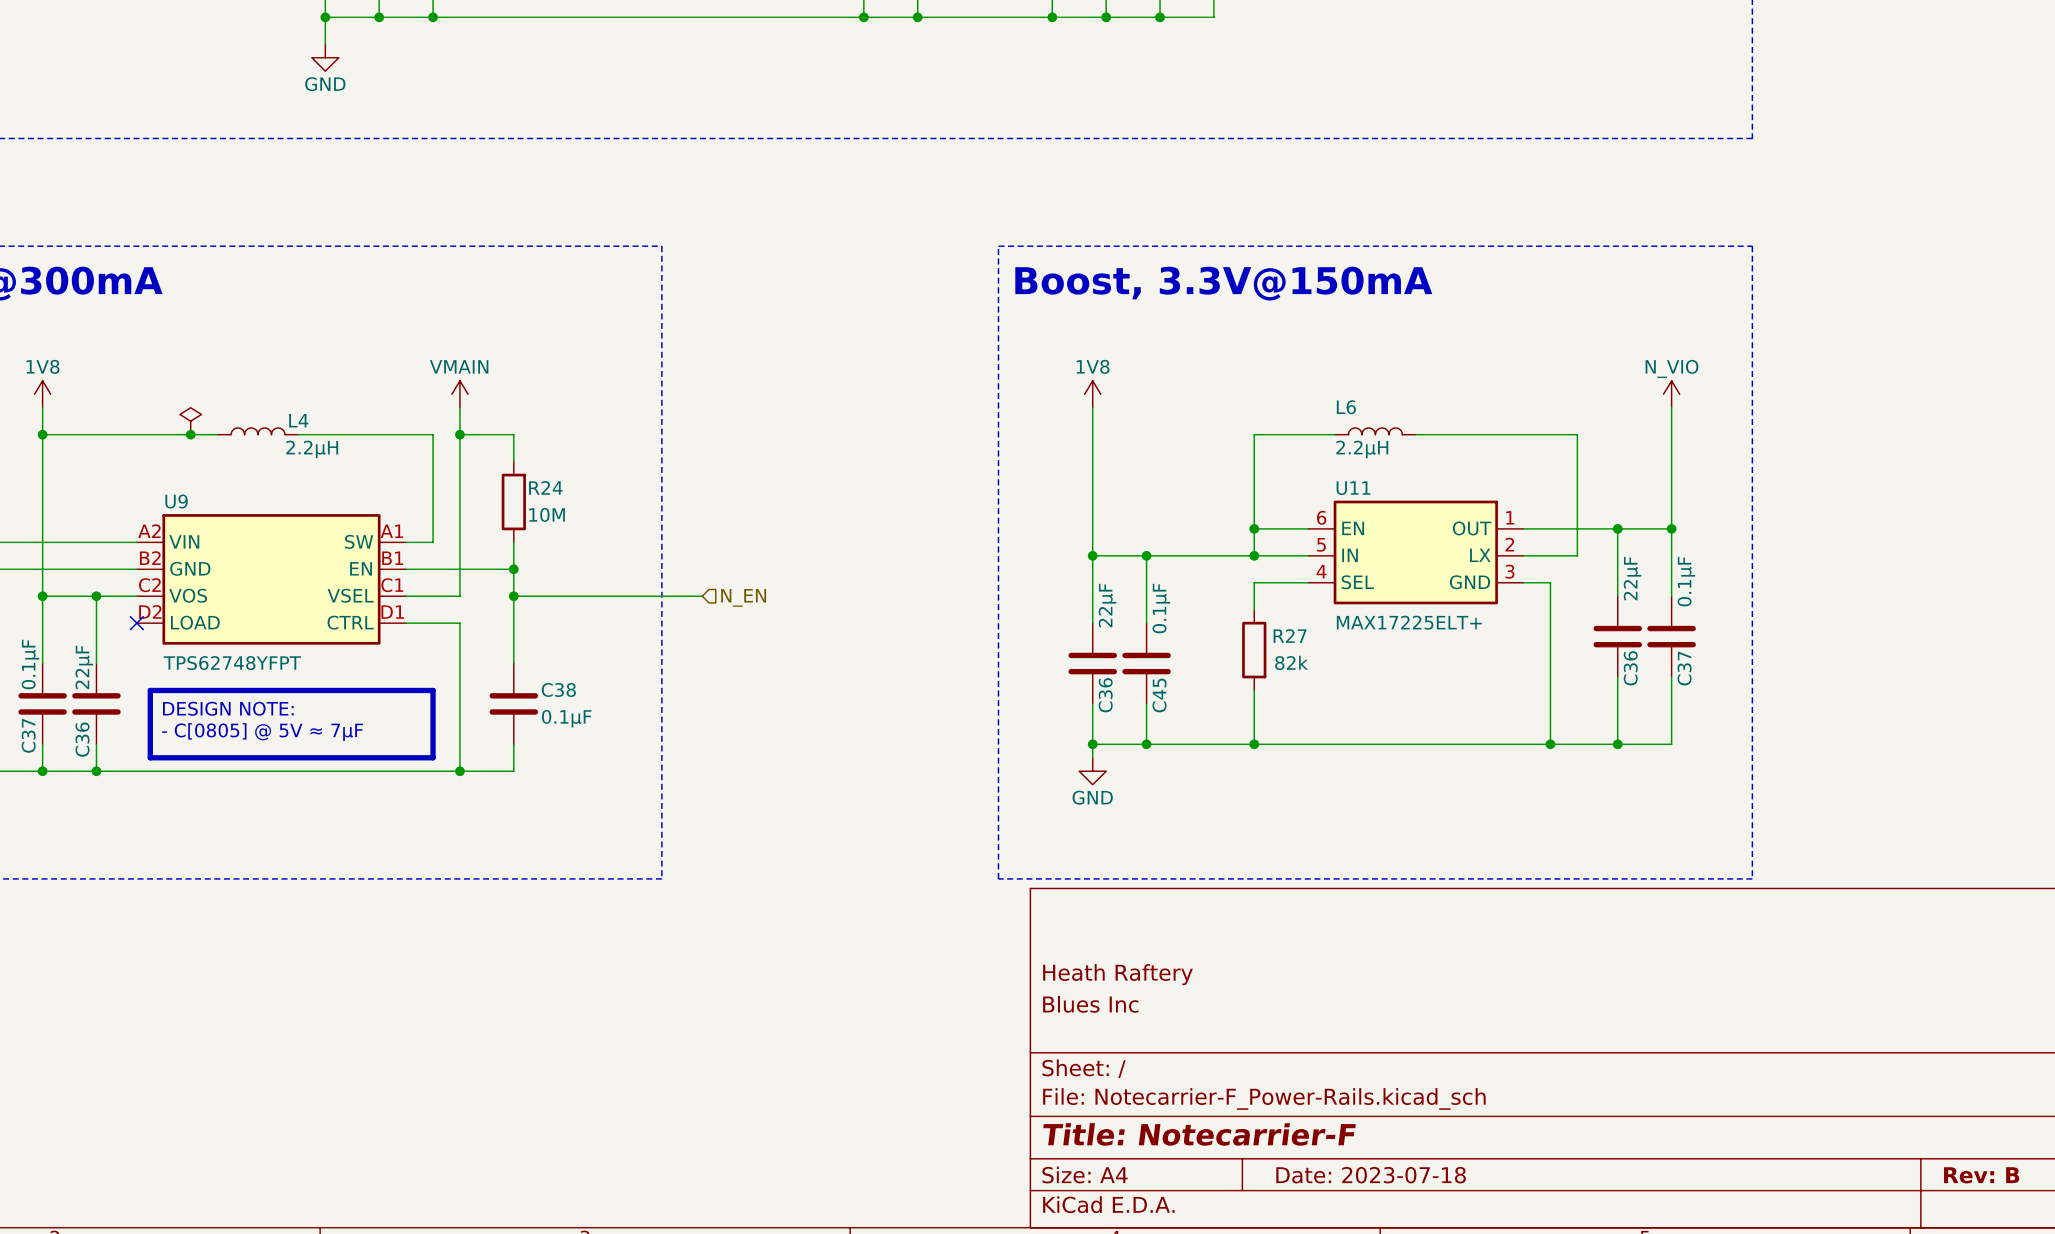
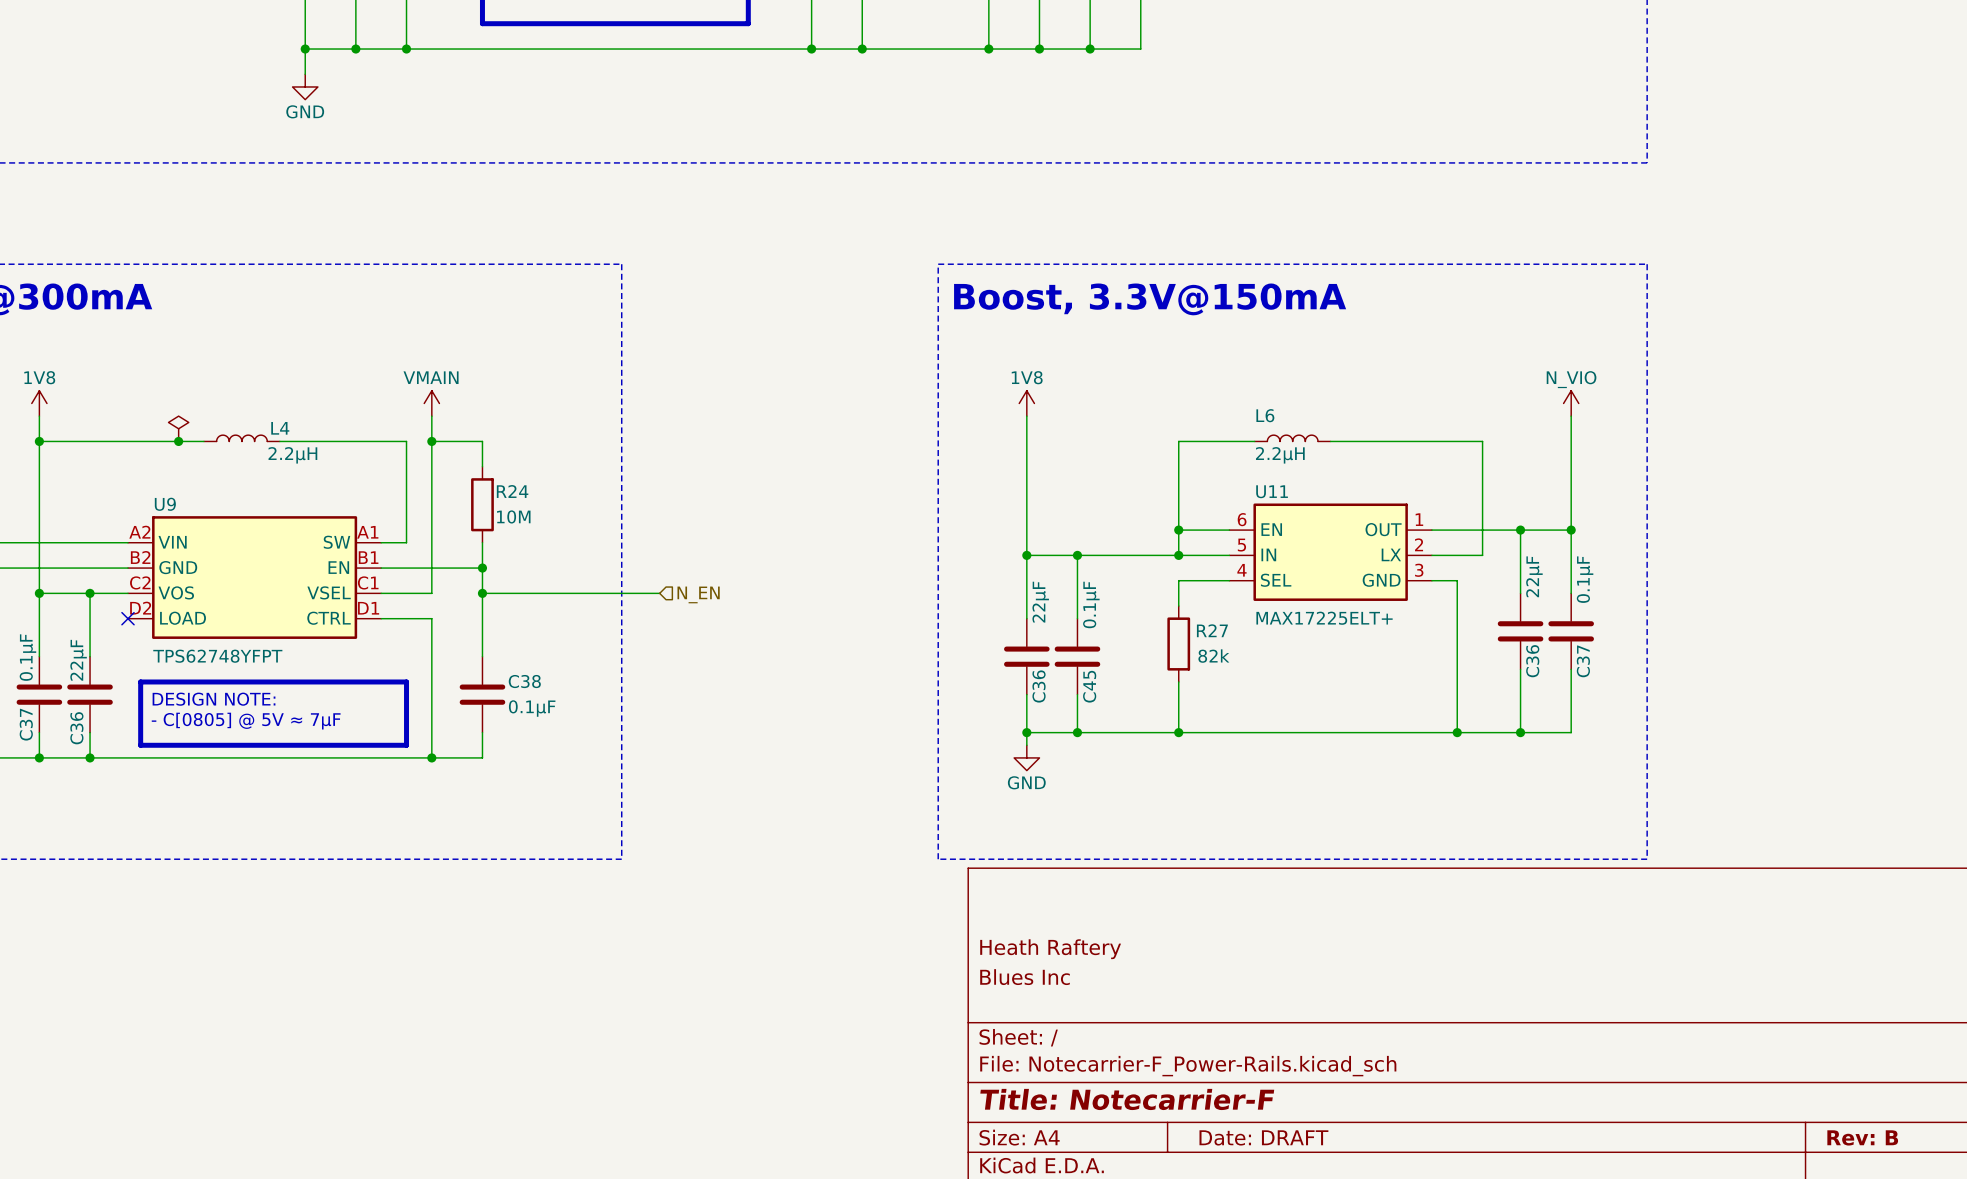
title block: Date: 2023-07-18 (1371, 1175) -> Date: DRAFT (1263, 1137)

